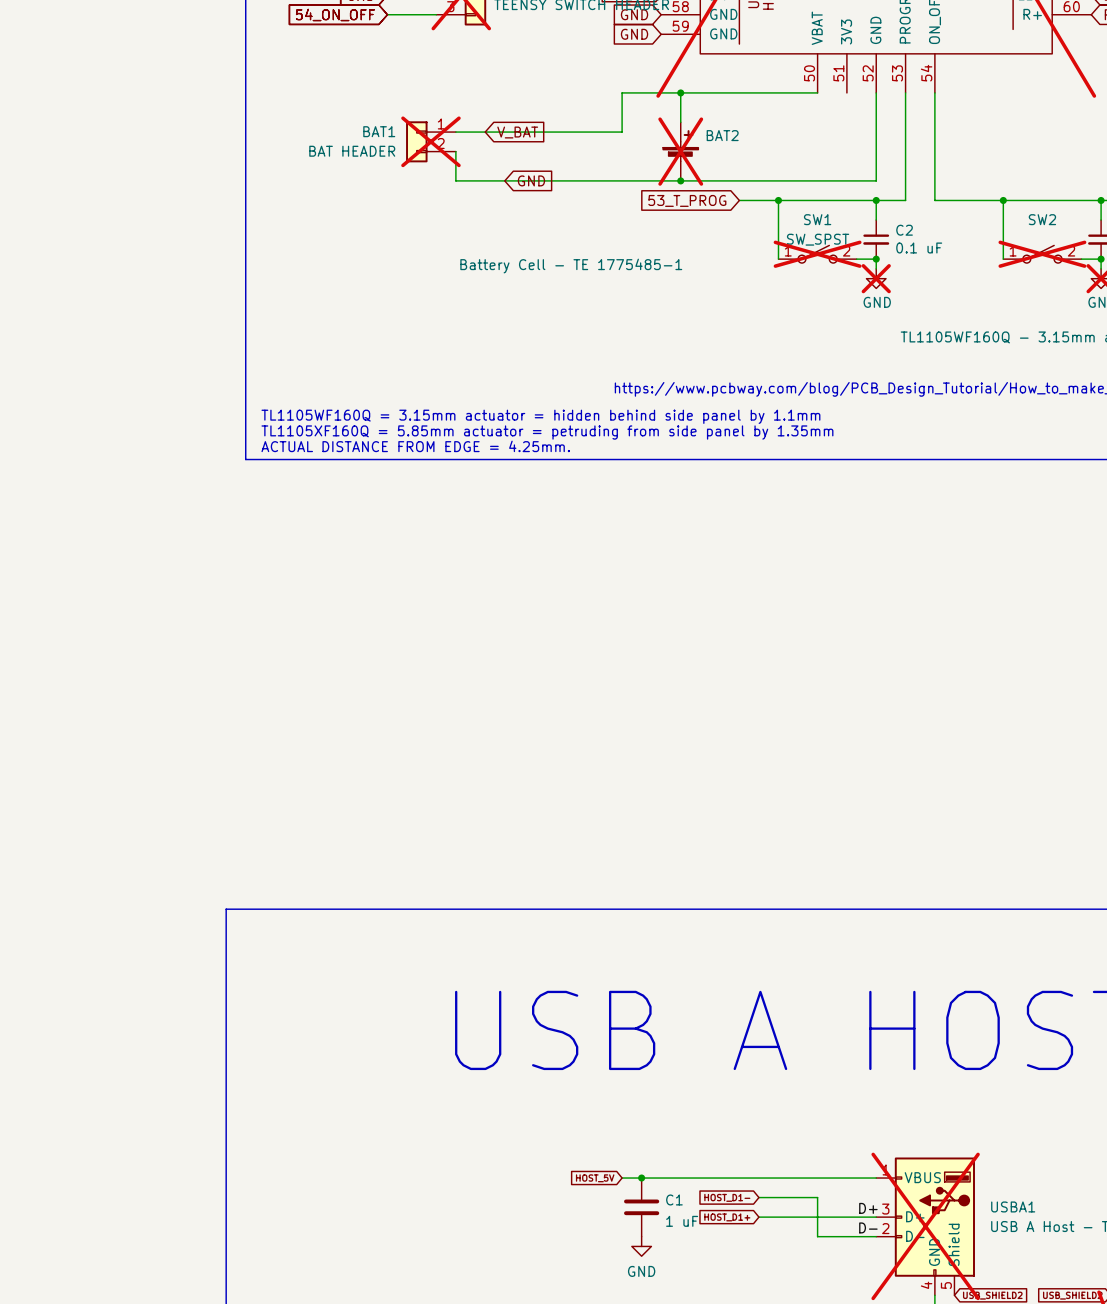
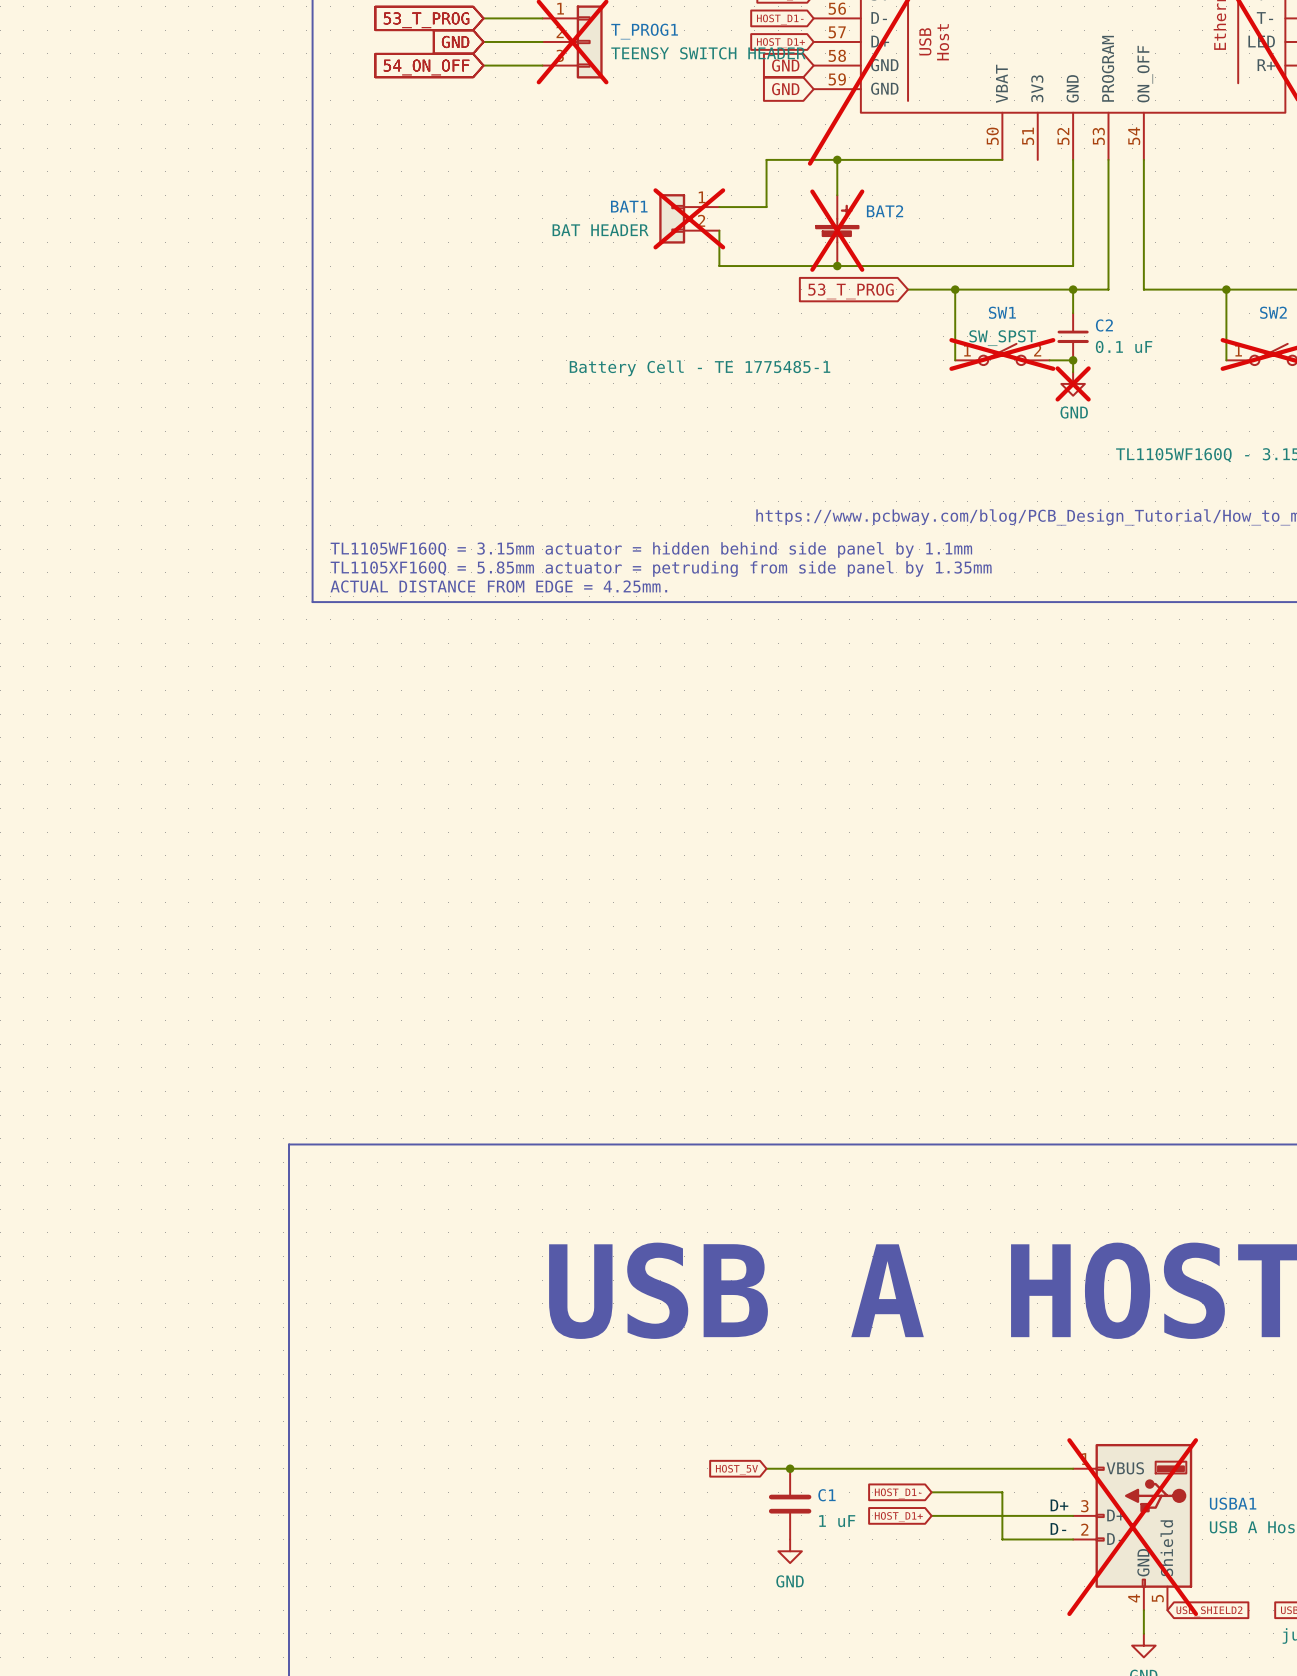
wire: (455, 132) (582, 132) -> none
global label: V_BAT (517, 132) -> none
BAT1 position: (430, 141) -> (689, 218)
wire: (455, 151) (455, 180) (582, 180) -> (719, 230) (719, 266)
global label: GND (531, 180) -> none

